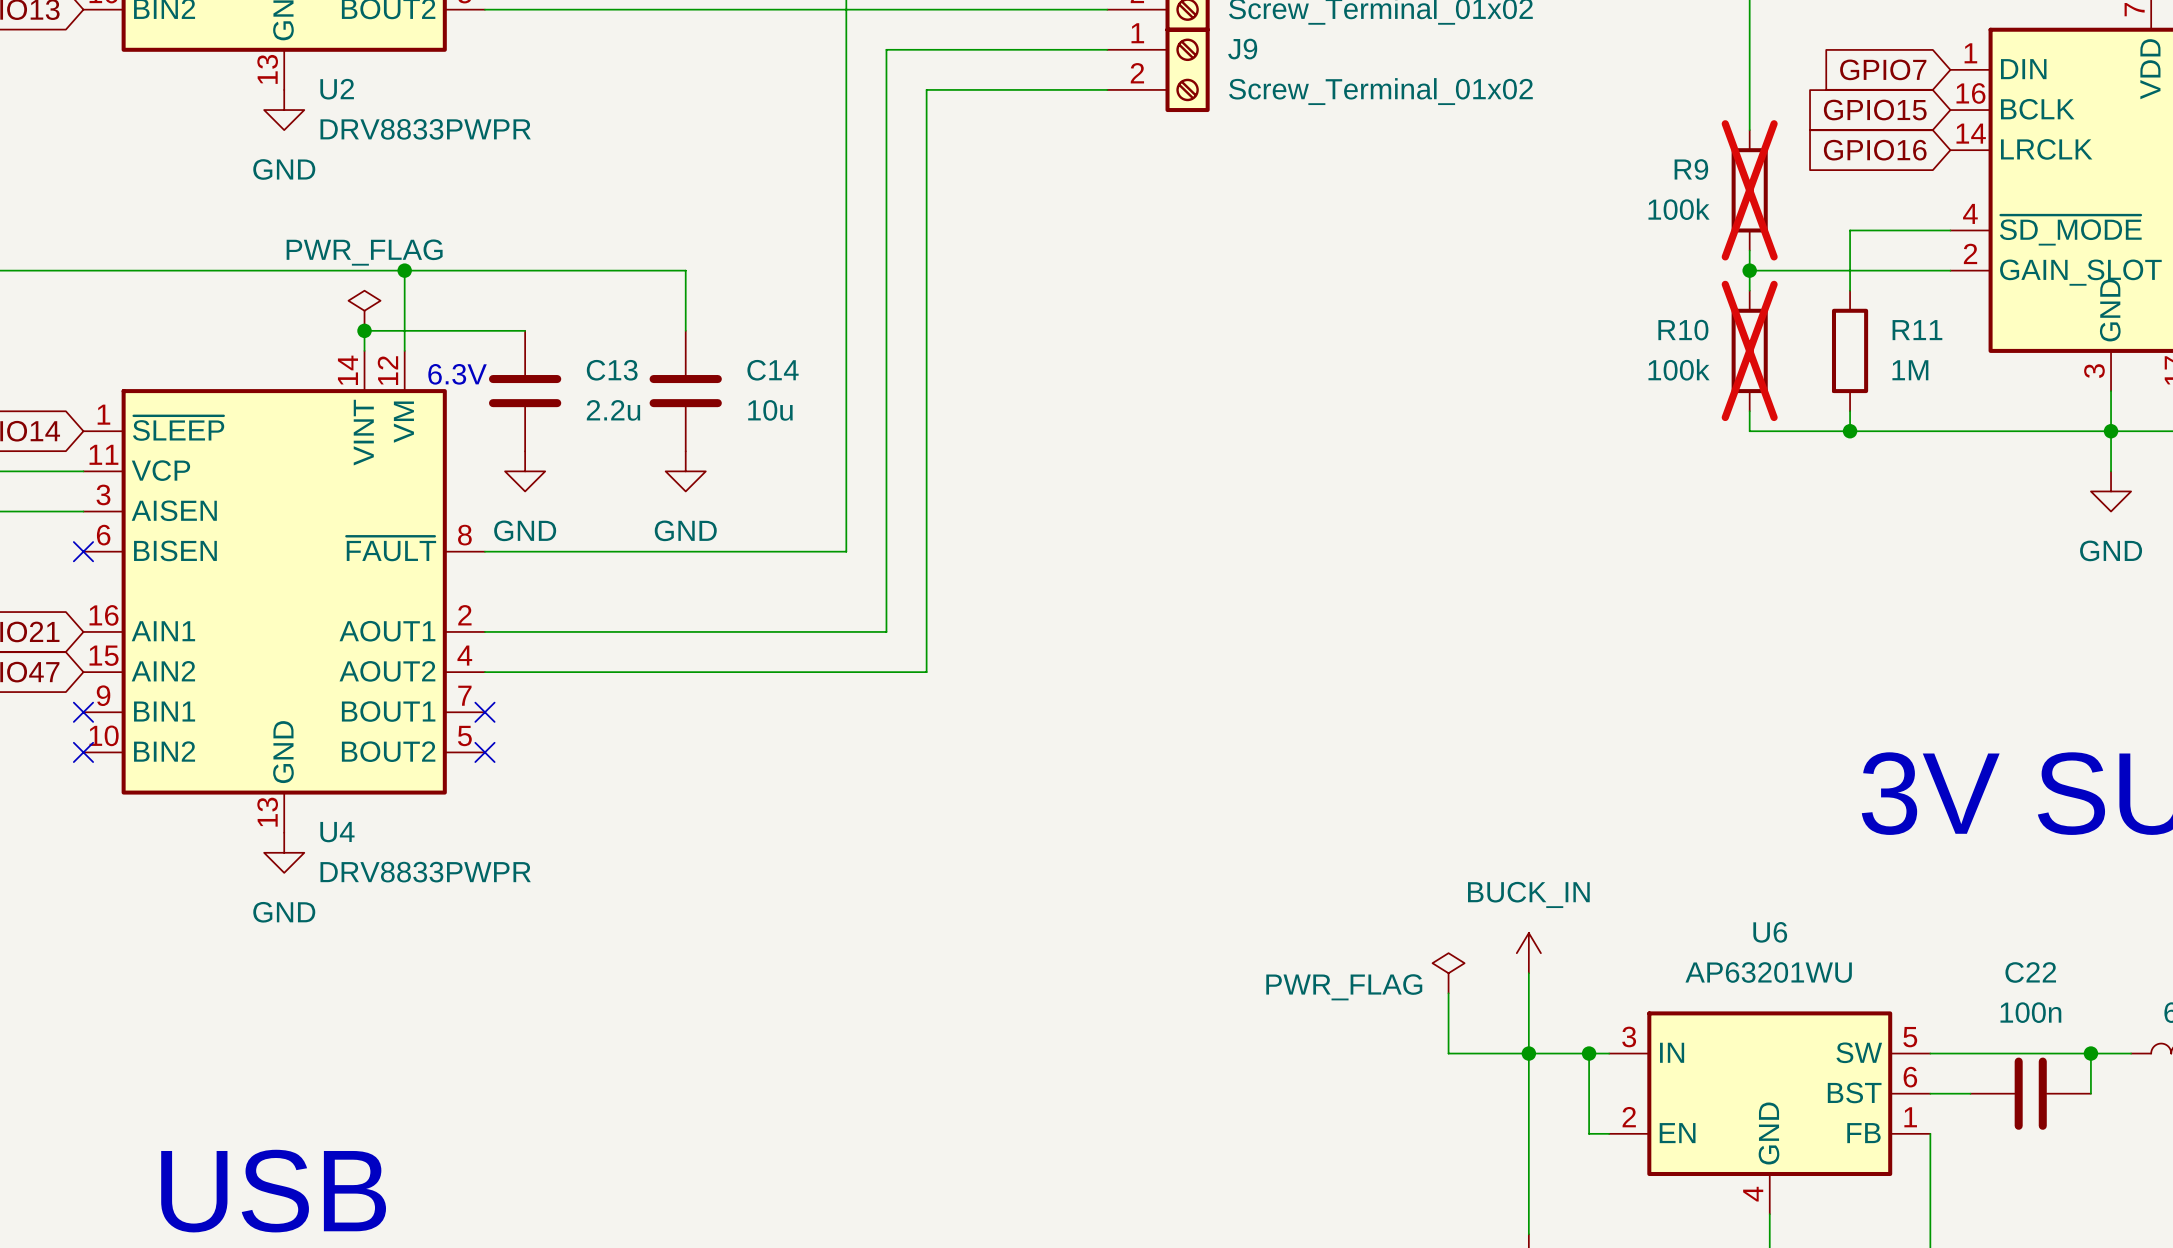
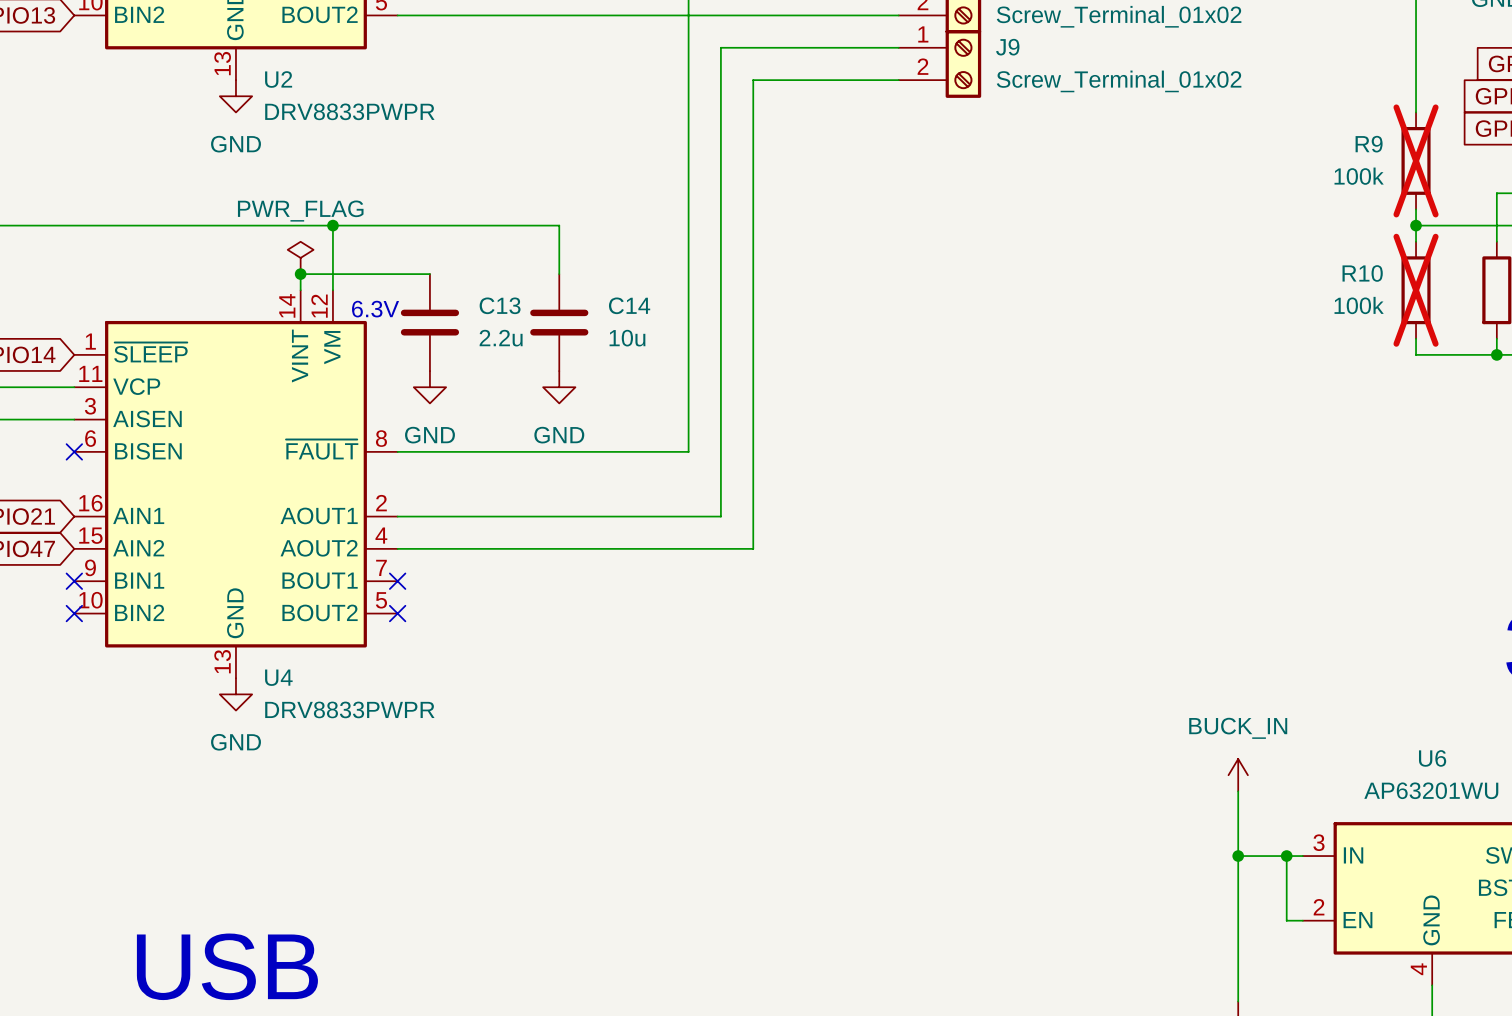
power symbol: PWR_FLAG (1448, 973) -> none
wire: (1448, 993) (1448, 1053) (1528, 1053) -> none

